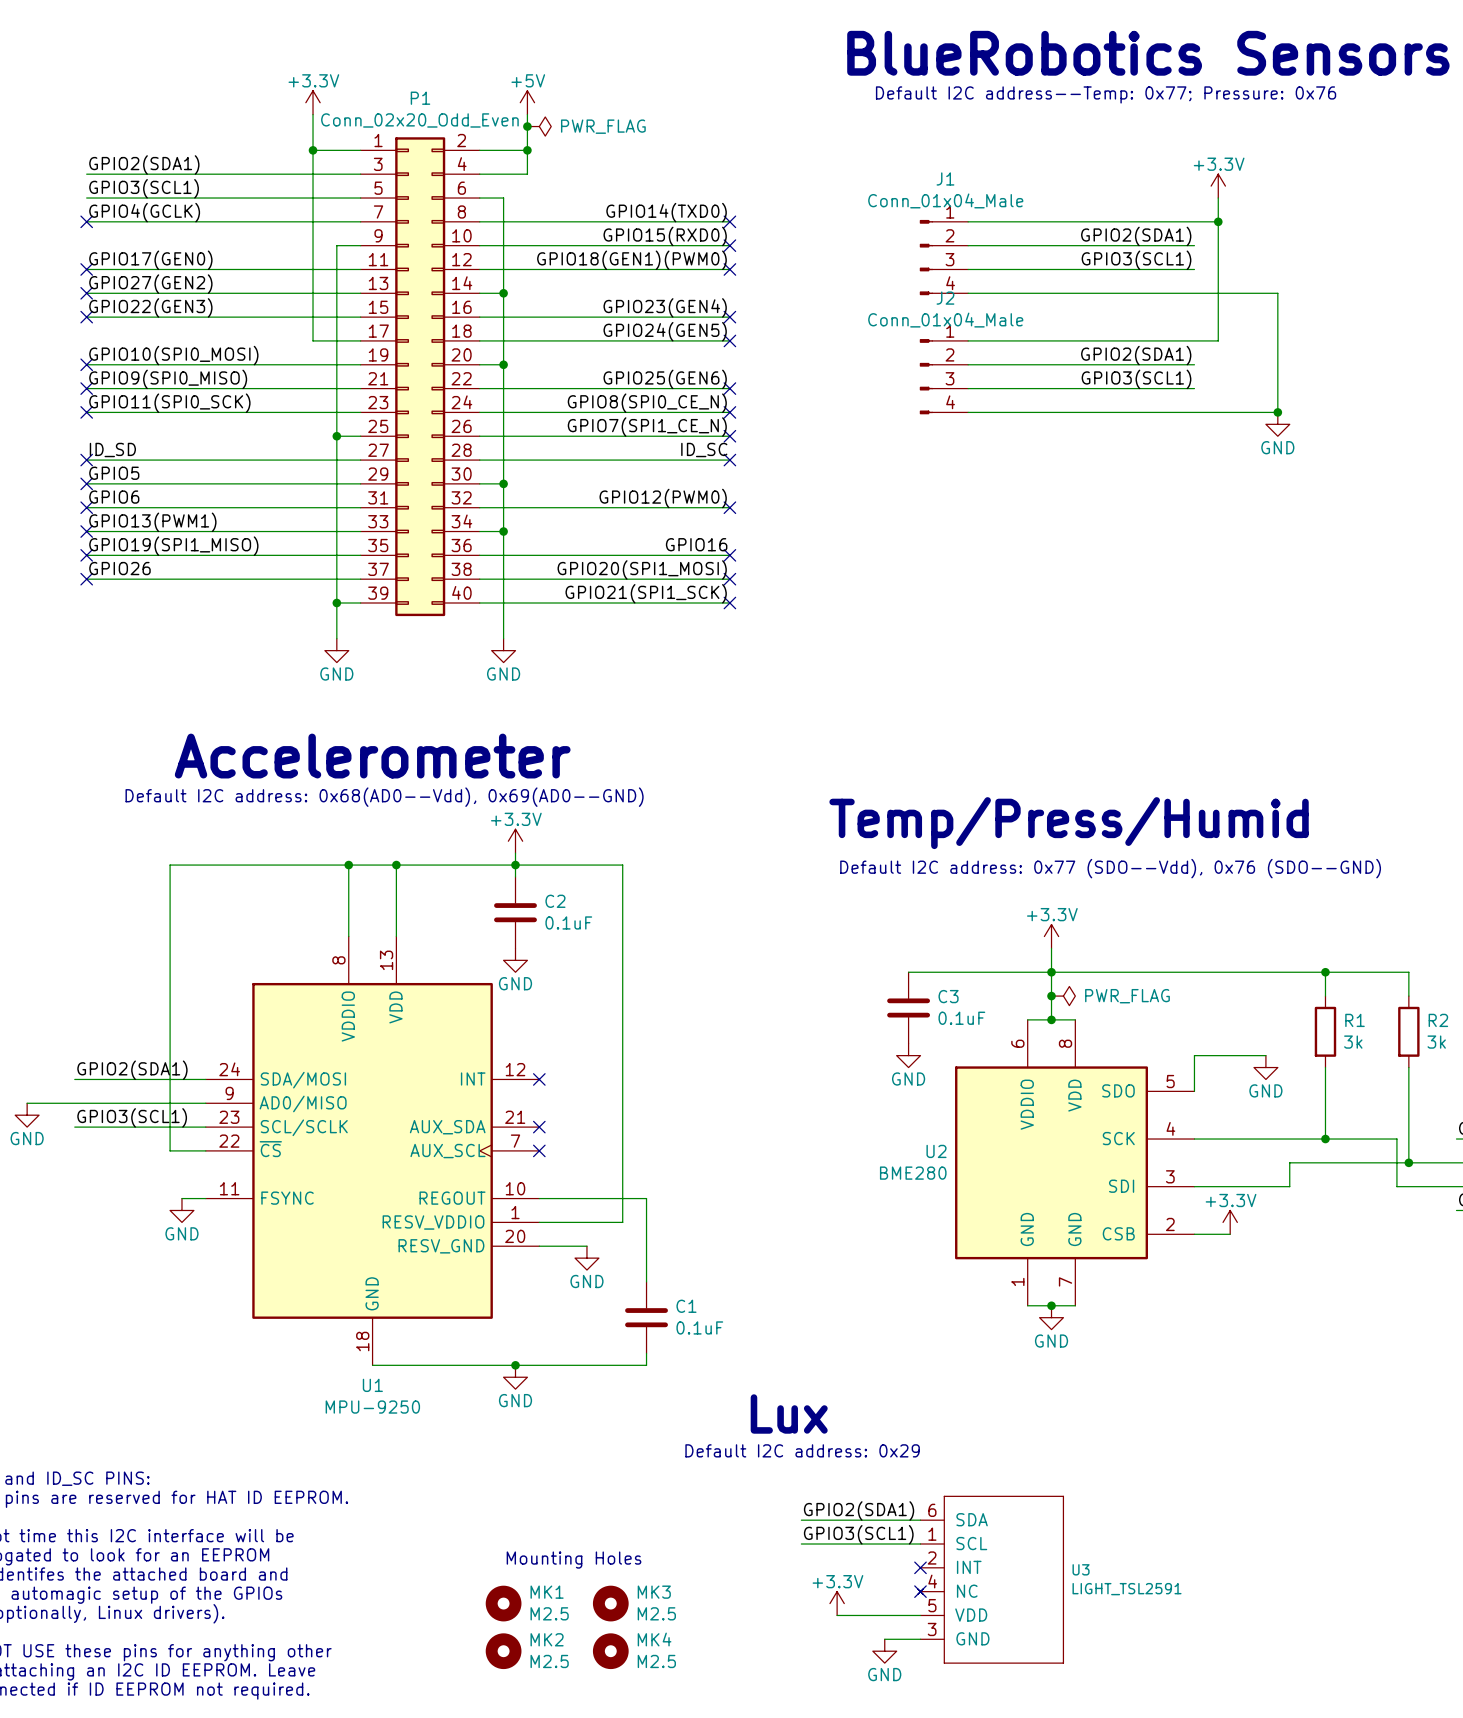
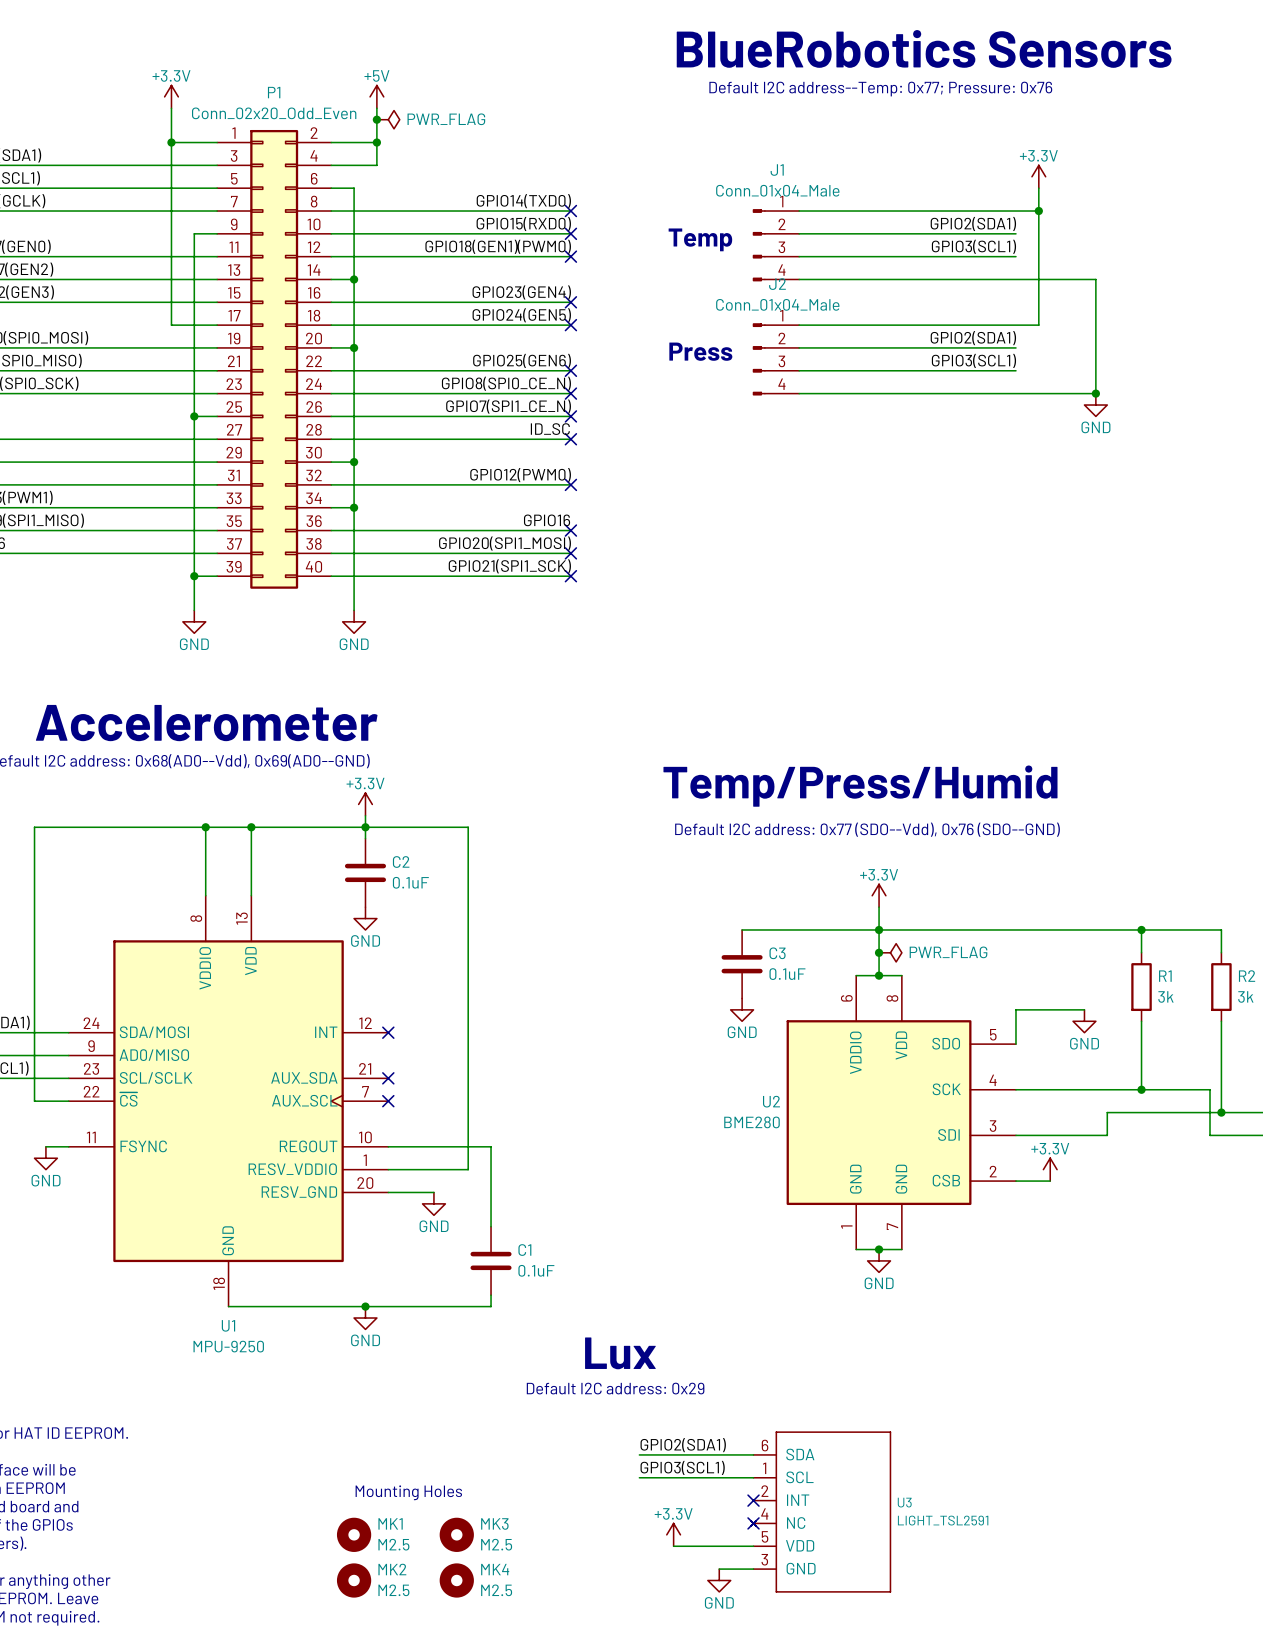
text: none -> Temp (700, 239)
text: none -> Press (700, 351)

